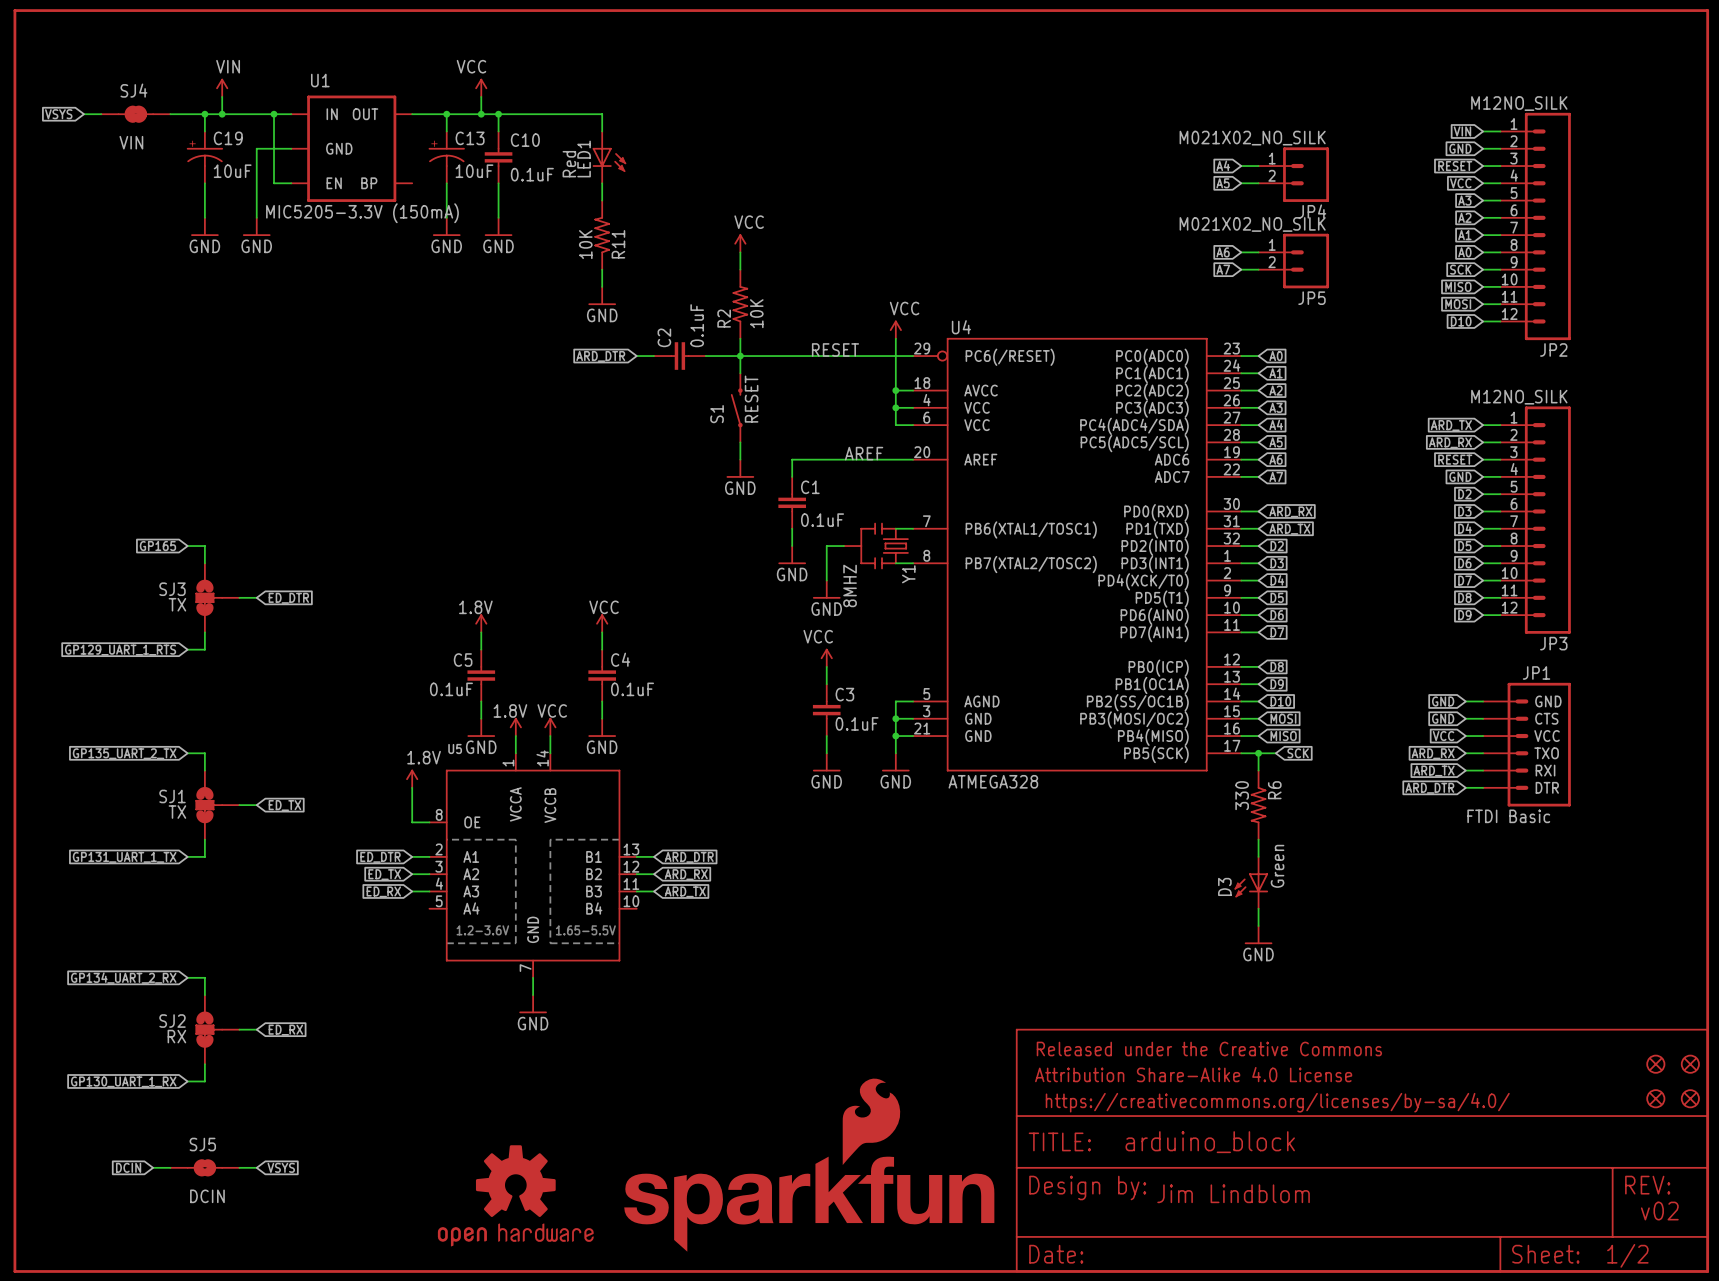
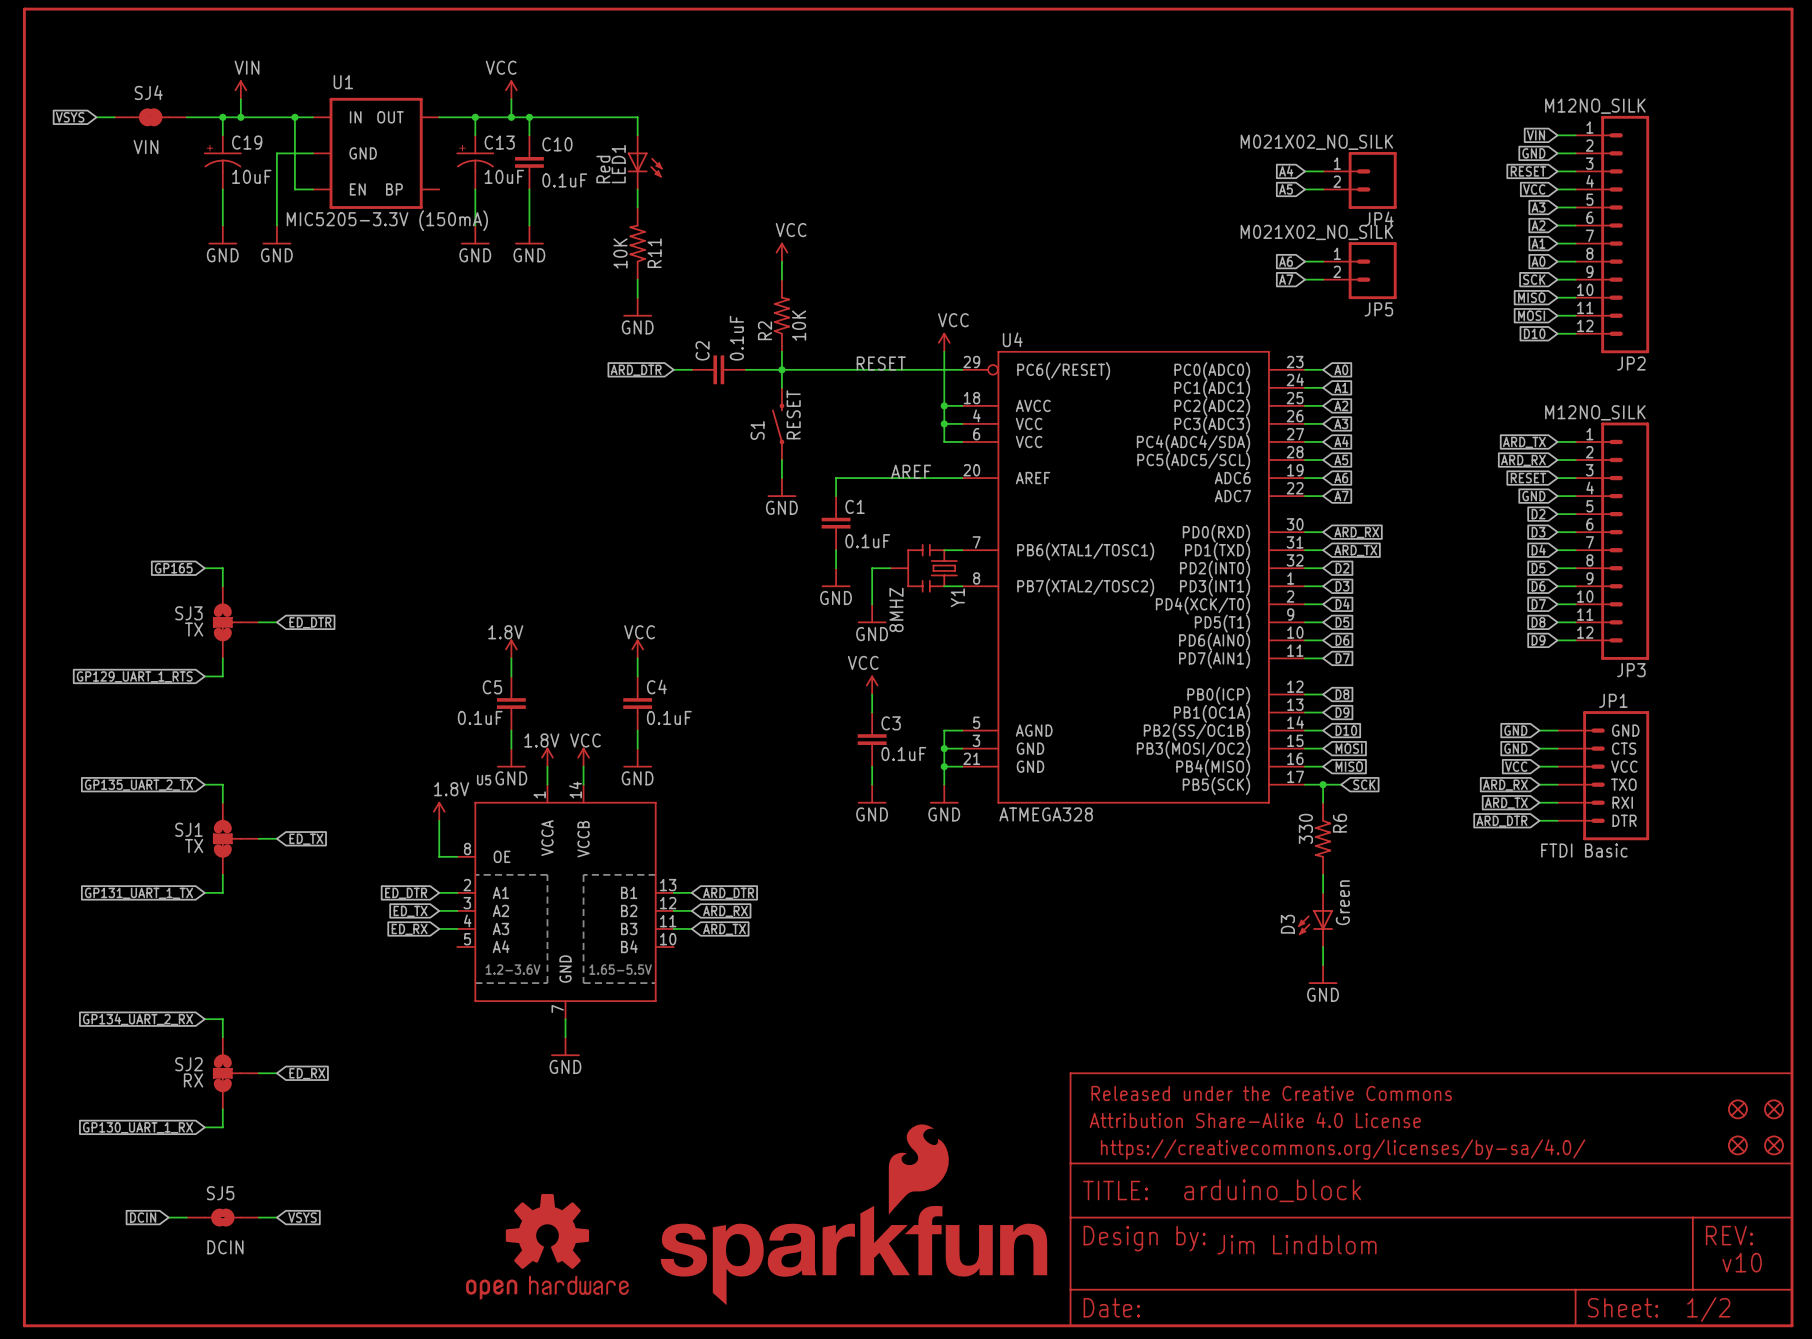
text: v02 (1659, 1211) -> v10 (1742, 1262)

